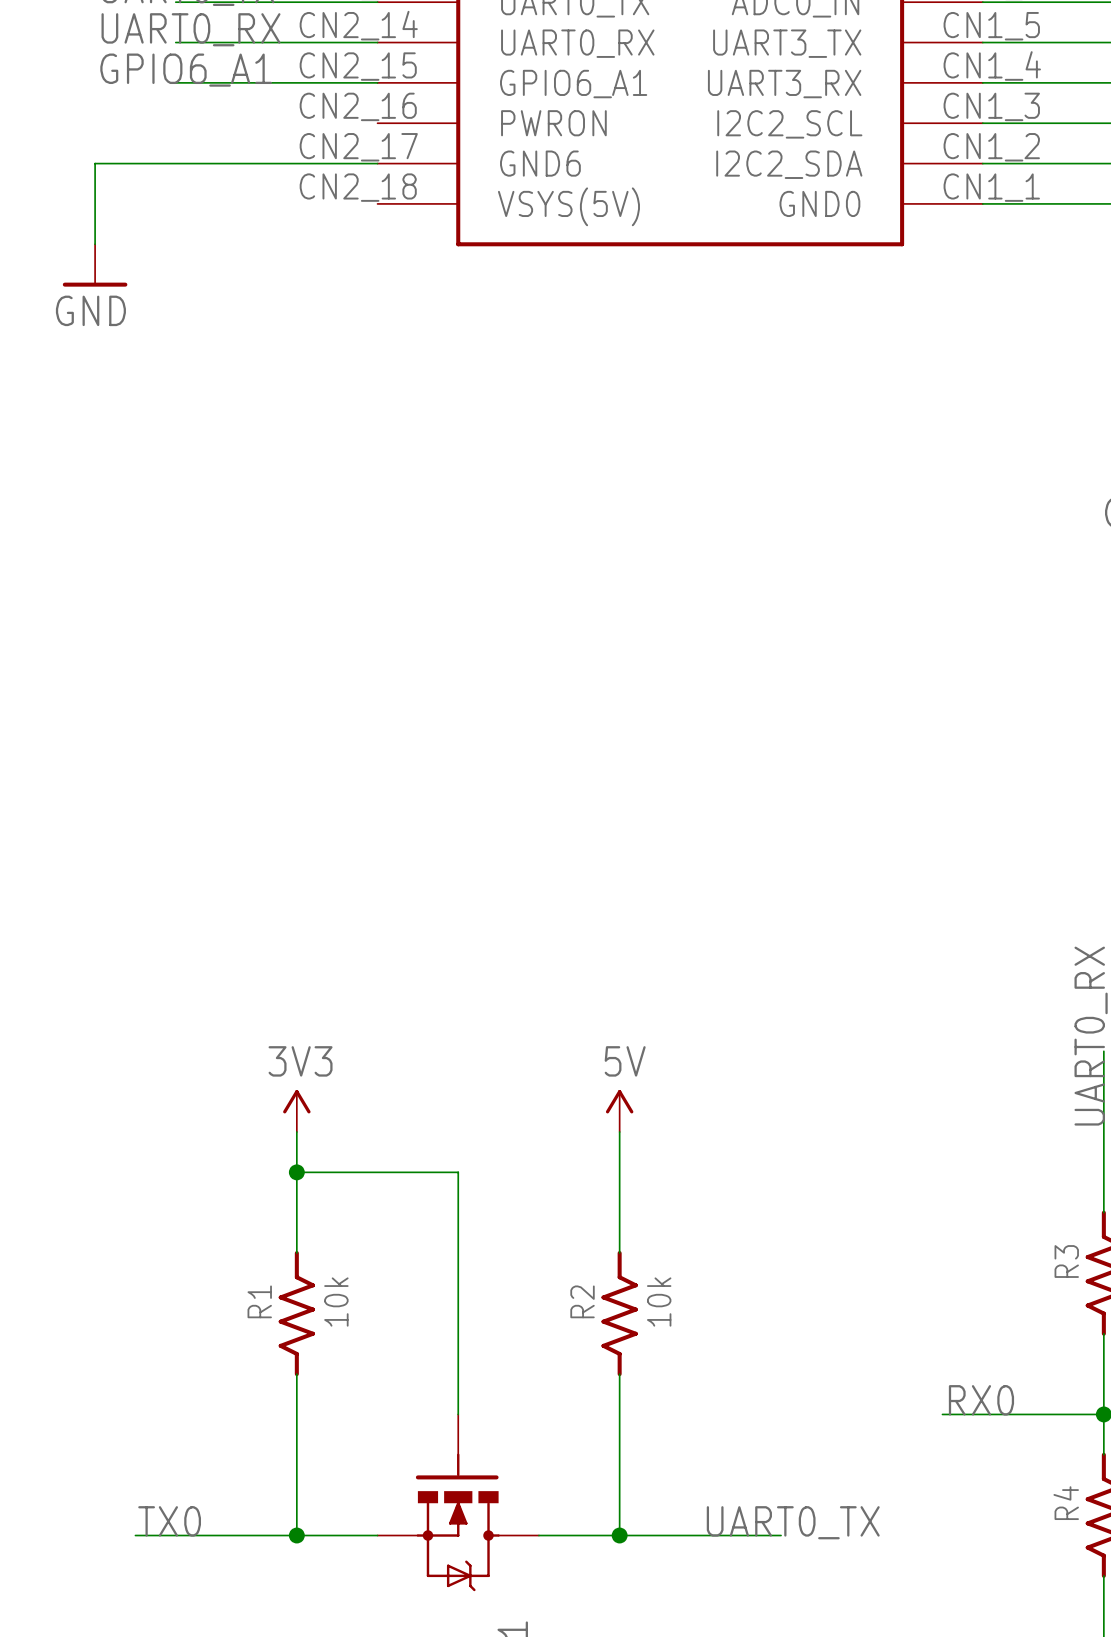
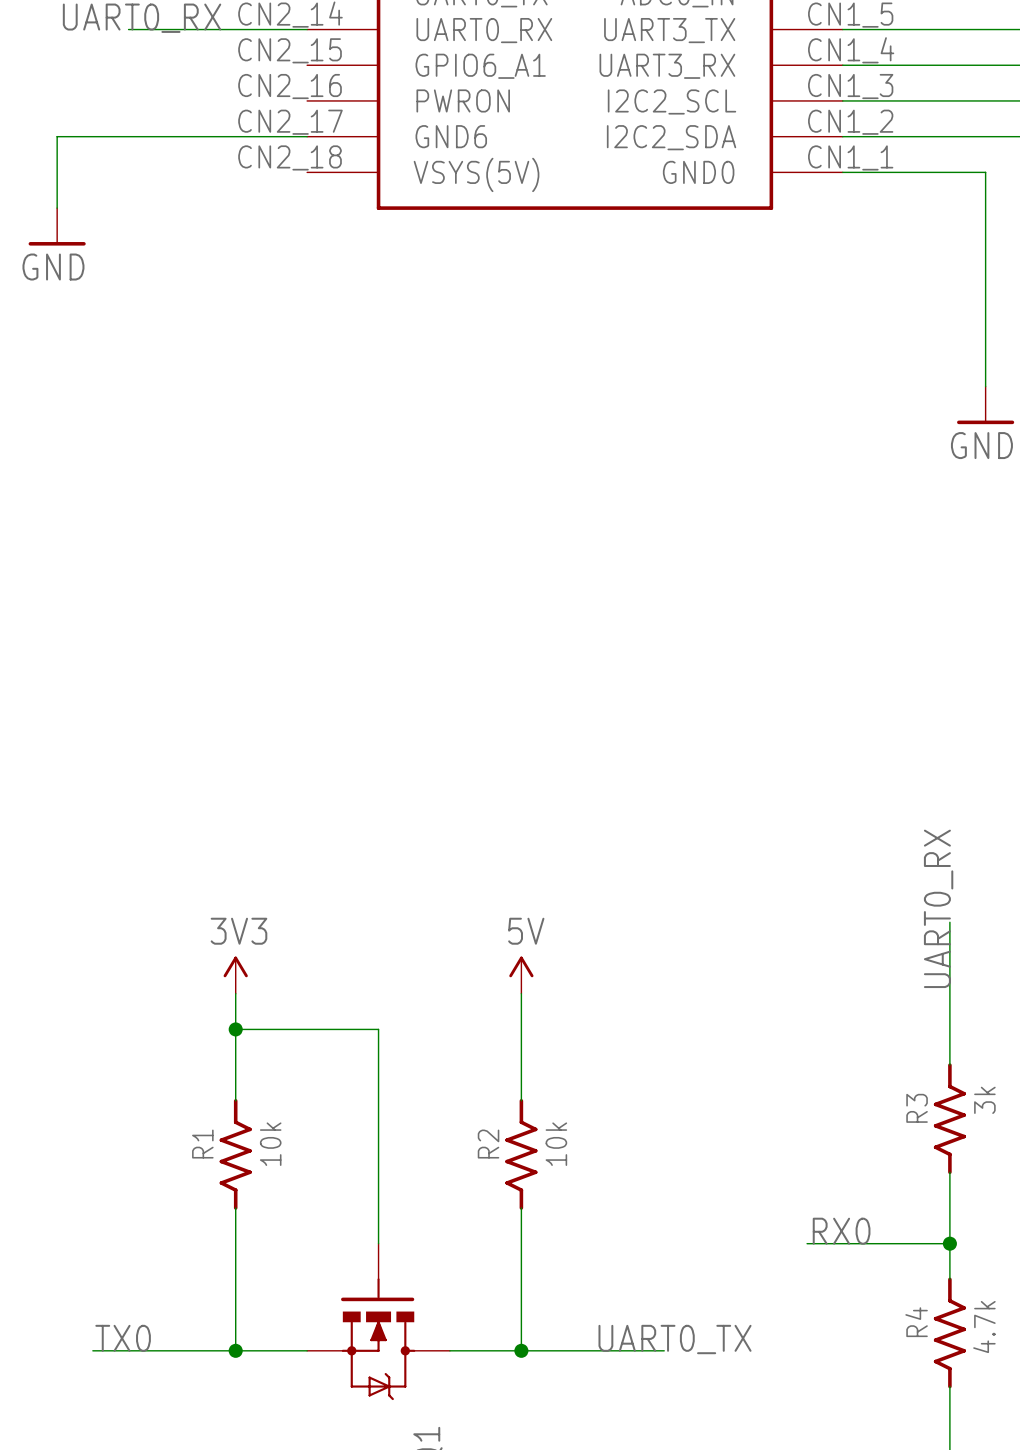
label: GPIO6_A1 (186, 70) -> none
wire: (175, 82) (377, 82) -> none

